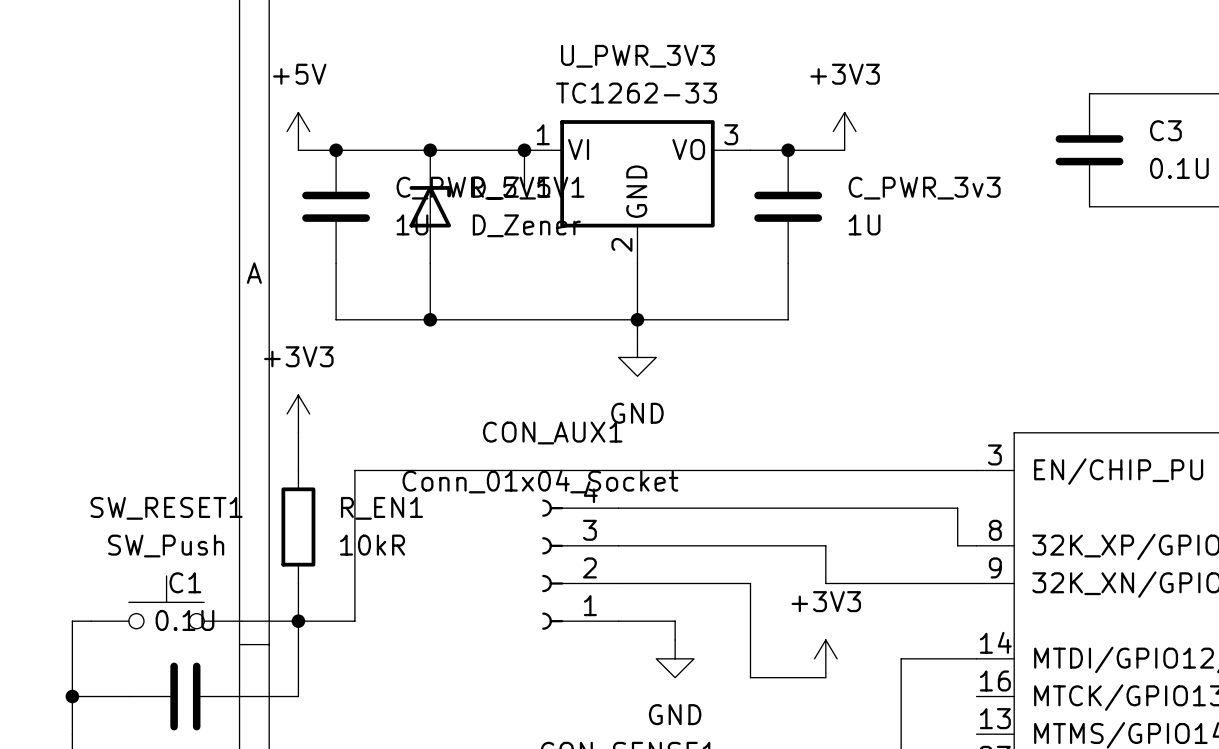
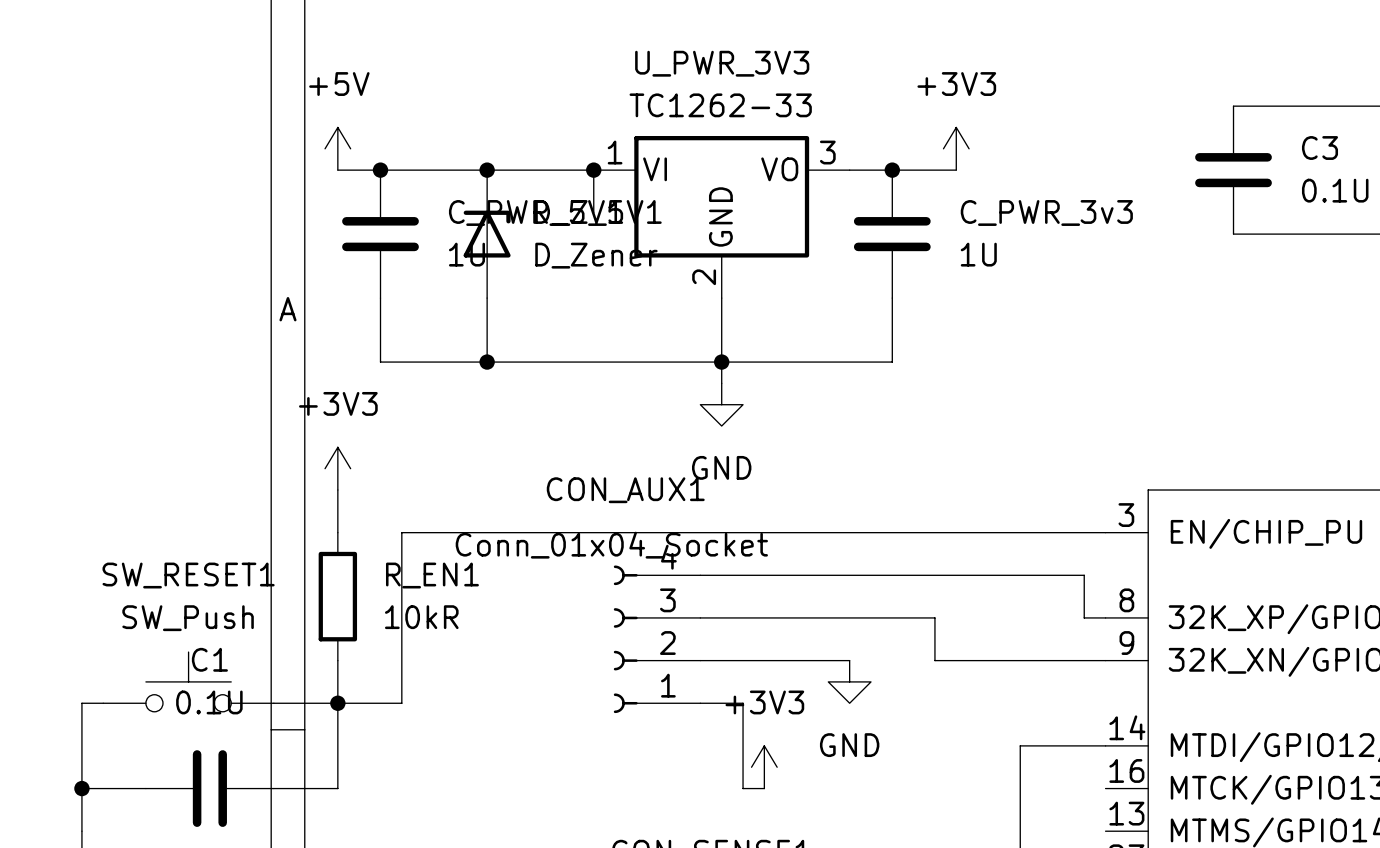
wire: (750, 583) (750, 677) (825, 677) -> none
wire: (656, 621) (675, 621) (675, 640) -> (743, 703) (743, 788) (764, 788)
power symbol position: GND (675, 658) -> GND (849, 681)
power symbol position: +3V3 (825, 658) -> +3V3 (764, 767)

